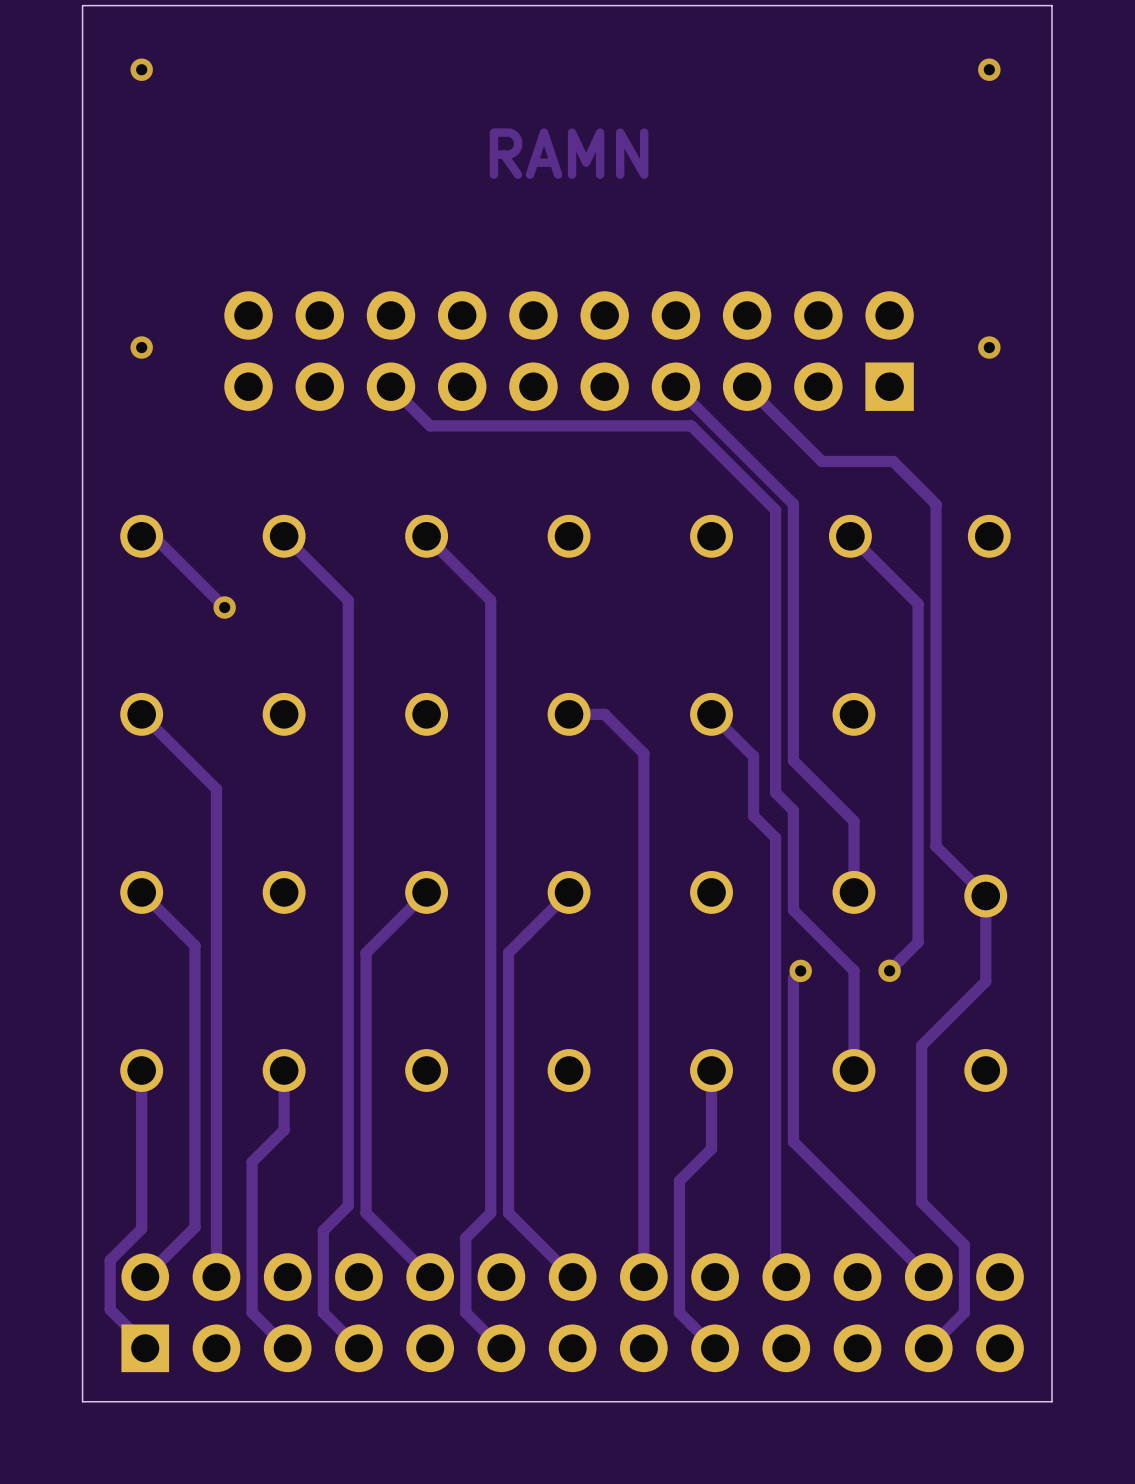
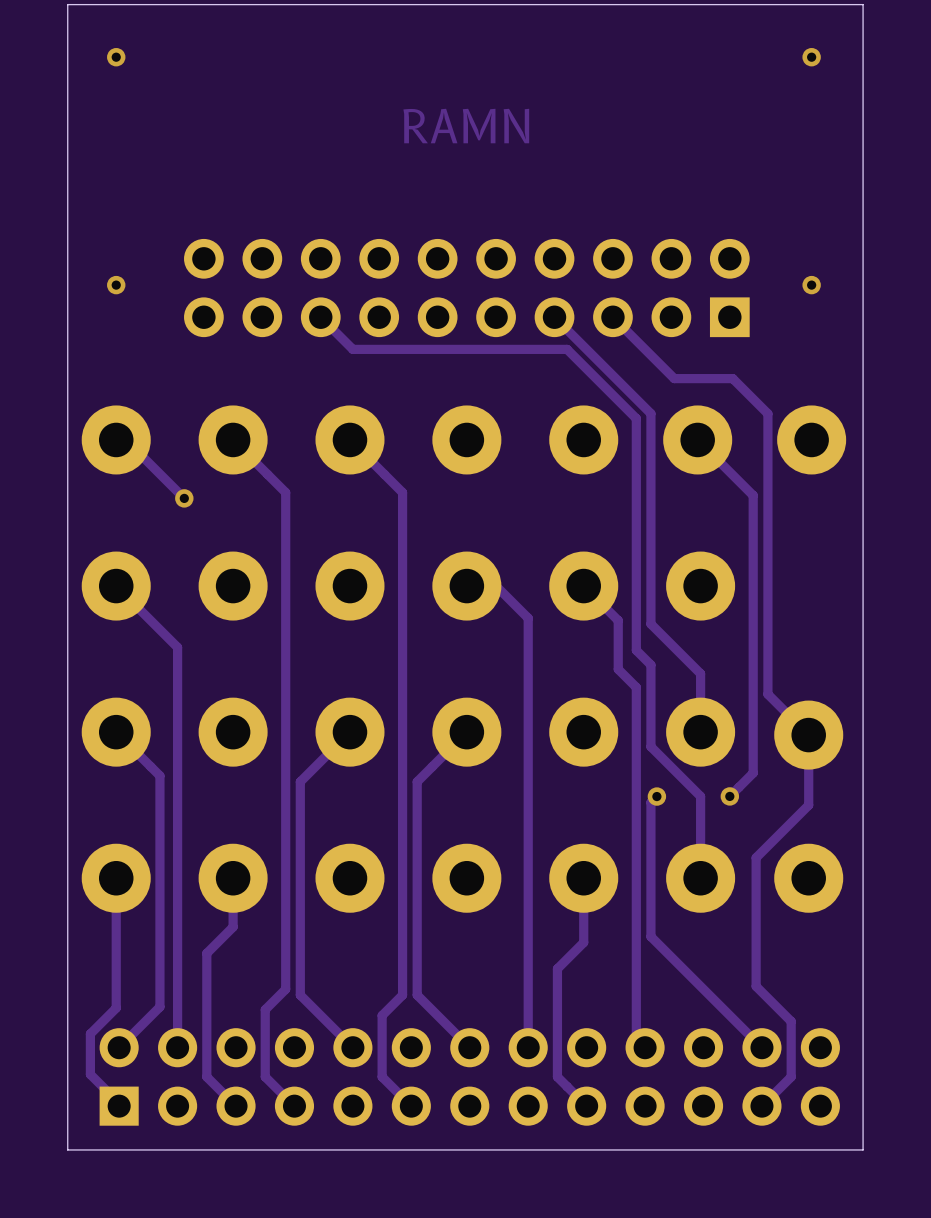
part footprint: [120, 514, 164, 558] -> [81, 405, 151, 475]
part footprint: [262, 514, 306, 558] -> [198, 405, 268, 475]
part footprint: [405, 514, 449, 558] -> [315, 405, 385, 475]
part footprint: [547, 514, 591, 558] -> [432, 405, 502, 475]
part footprint: [690, 514, 733, 558] -> [549, 405, 619, 475]
part footprint: [828, 514, 872, 558] -> [663, 405, 733, 475]
part footprint: [967, 514, 1011, 558] -> [777, 405, 847, 475]
part footprint: [120, 692, 164, 736] -> [81, 551, 151, 621]
part footprint: [262, 692, 306, 736] -> [198, 551, 268, 621]
part footprint: [405, 692, 449, 736] -> [315, 551, 385, 621]
part footprint: [547, 692, 591, 736] -> [432, 551, 502, 621]
part footprint: [690, 692, 733, 736] -> [549, 551, 619, 621]
part footprint: [832, 692, 876, 736] -> [666, 551, 736, 621]
part footprint: [120, 870, 164, 914] -> [81, 697, 151, 767]
part footprint: [262, 870, 306, 914] -> [198, 697, 268, 767]
part footprint: [405, 870, 449, 914] -> [315, 697, 385, 767]
part footprint: [547, 870, 591, 914] -> [432, 697, 502, 767]
part footprint: [690, 870, 733, 914] -> [549, 697, 619, 767]
part footprint: [832, 870, 876, 914] -> [666, 697, 736, 767]
part footprint: [964, 874, 1008, 918] -> [774, 700, 844, 770]
part footprint: [120, 1049, 164, 1092] -> [81, 843, 151, 913]
part footprint: [262, 1049, 306, 1092] -> [198, 843, 268, 913]
part footprint: [405, 1049, 449, 1092] -> [315, 843, 385, 913]
part footprint: [547, 1049, 591, 1092] -> [432, 843, 502, 913]
part footprint: [690, 1049, 733, 1092] -> [549, 843, 619, 913]
part footprint: [832, 1049, 876, 1092] -> [666, 843, 736, 913]
part footprint: [964, 1049, 1008, 1092] -> [774, 843, 844, 913]

